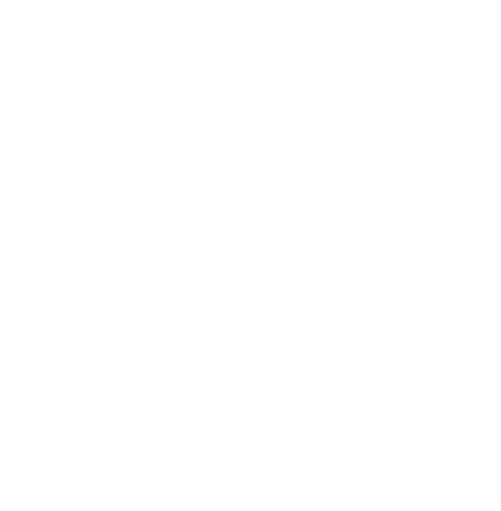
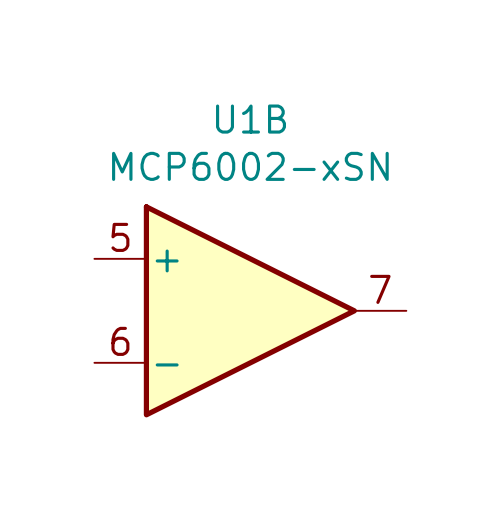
U1B: none -> MCP6002-xSN (250, 310)

